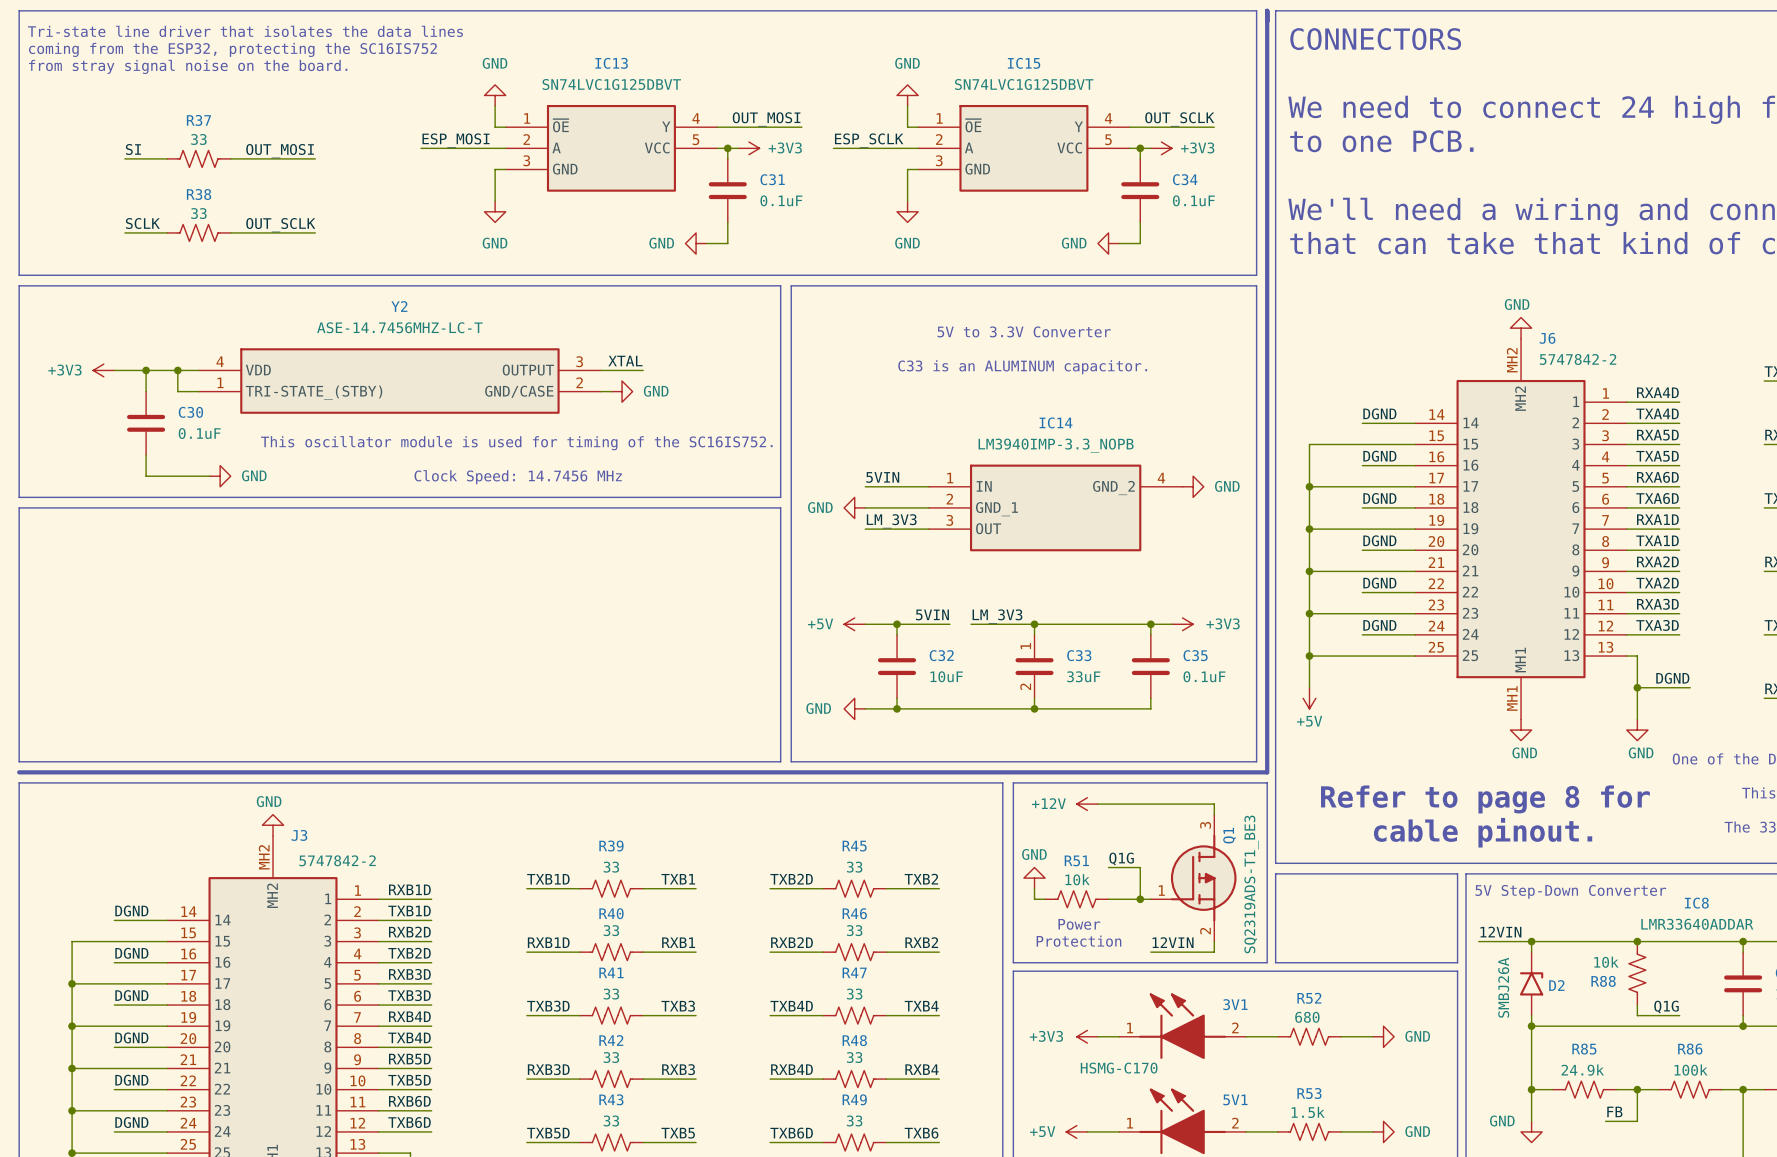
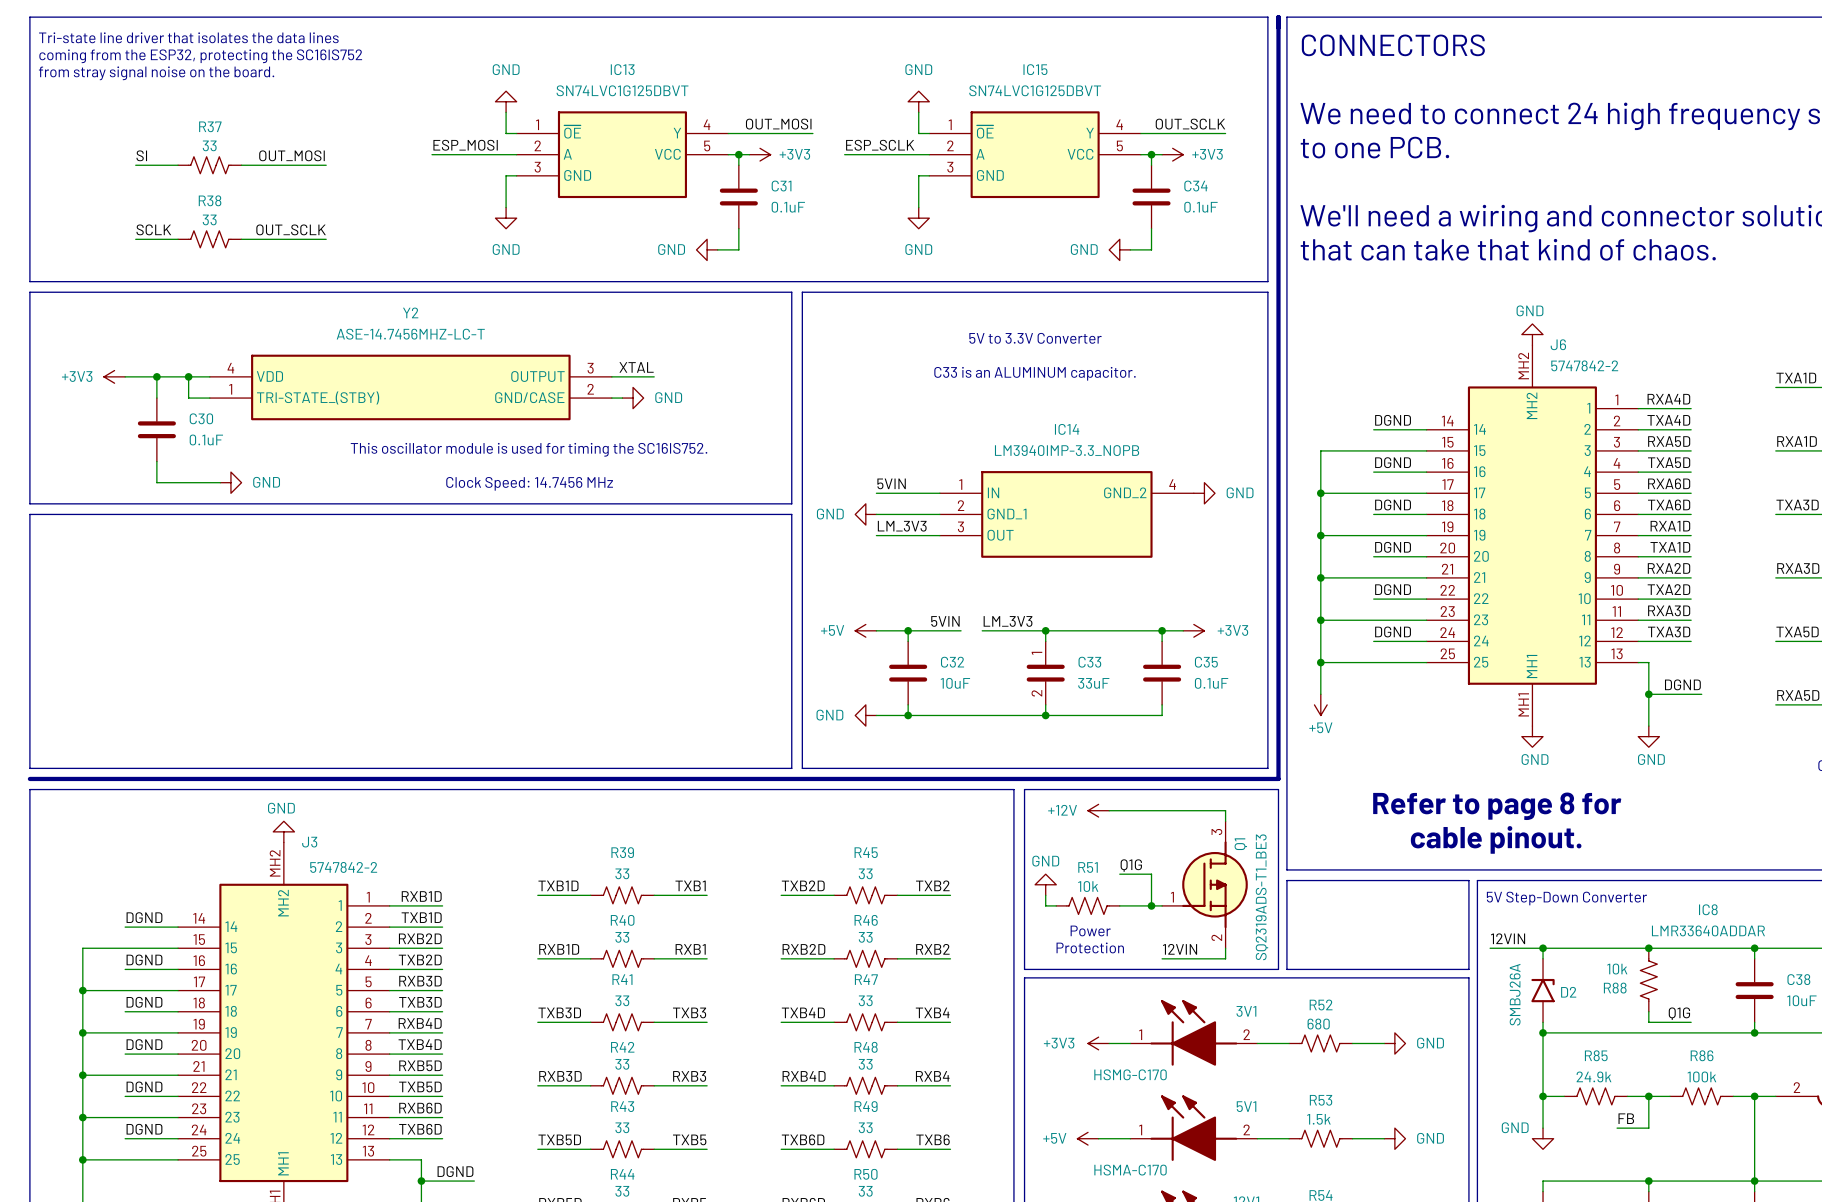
text: This oscillator module is used for timing of the SC16IS752. (516, 443) -> This oscillator module is used for timing the SC16IS752. (529, 449)

